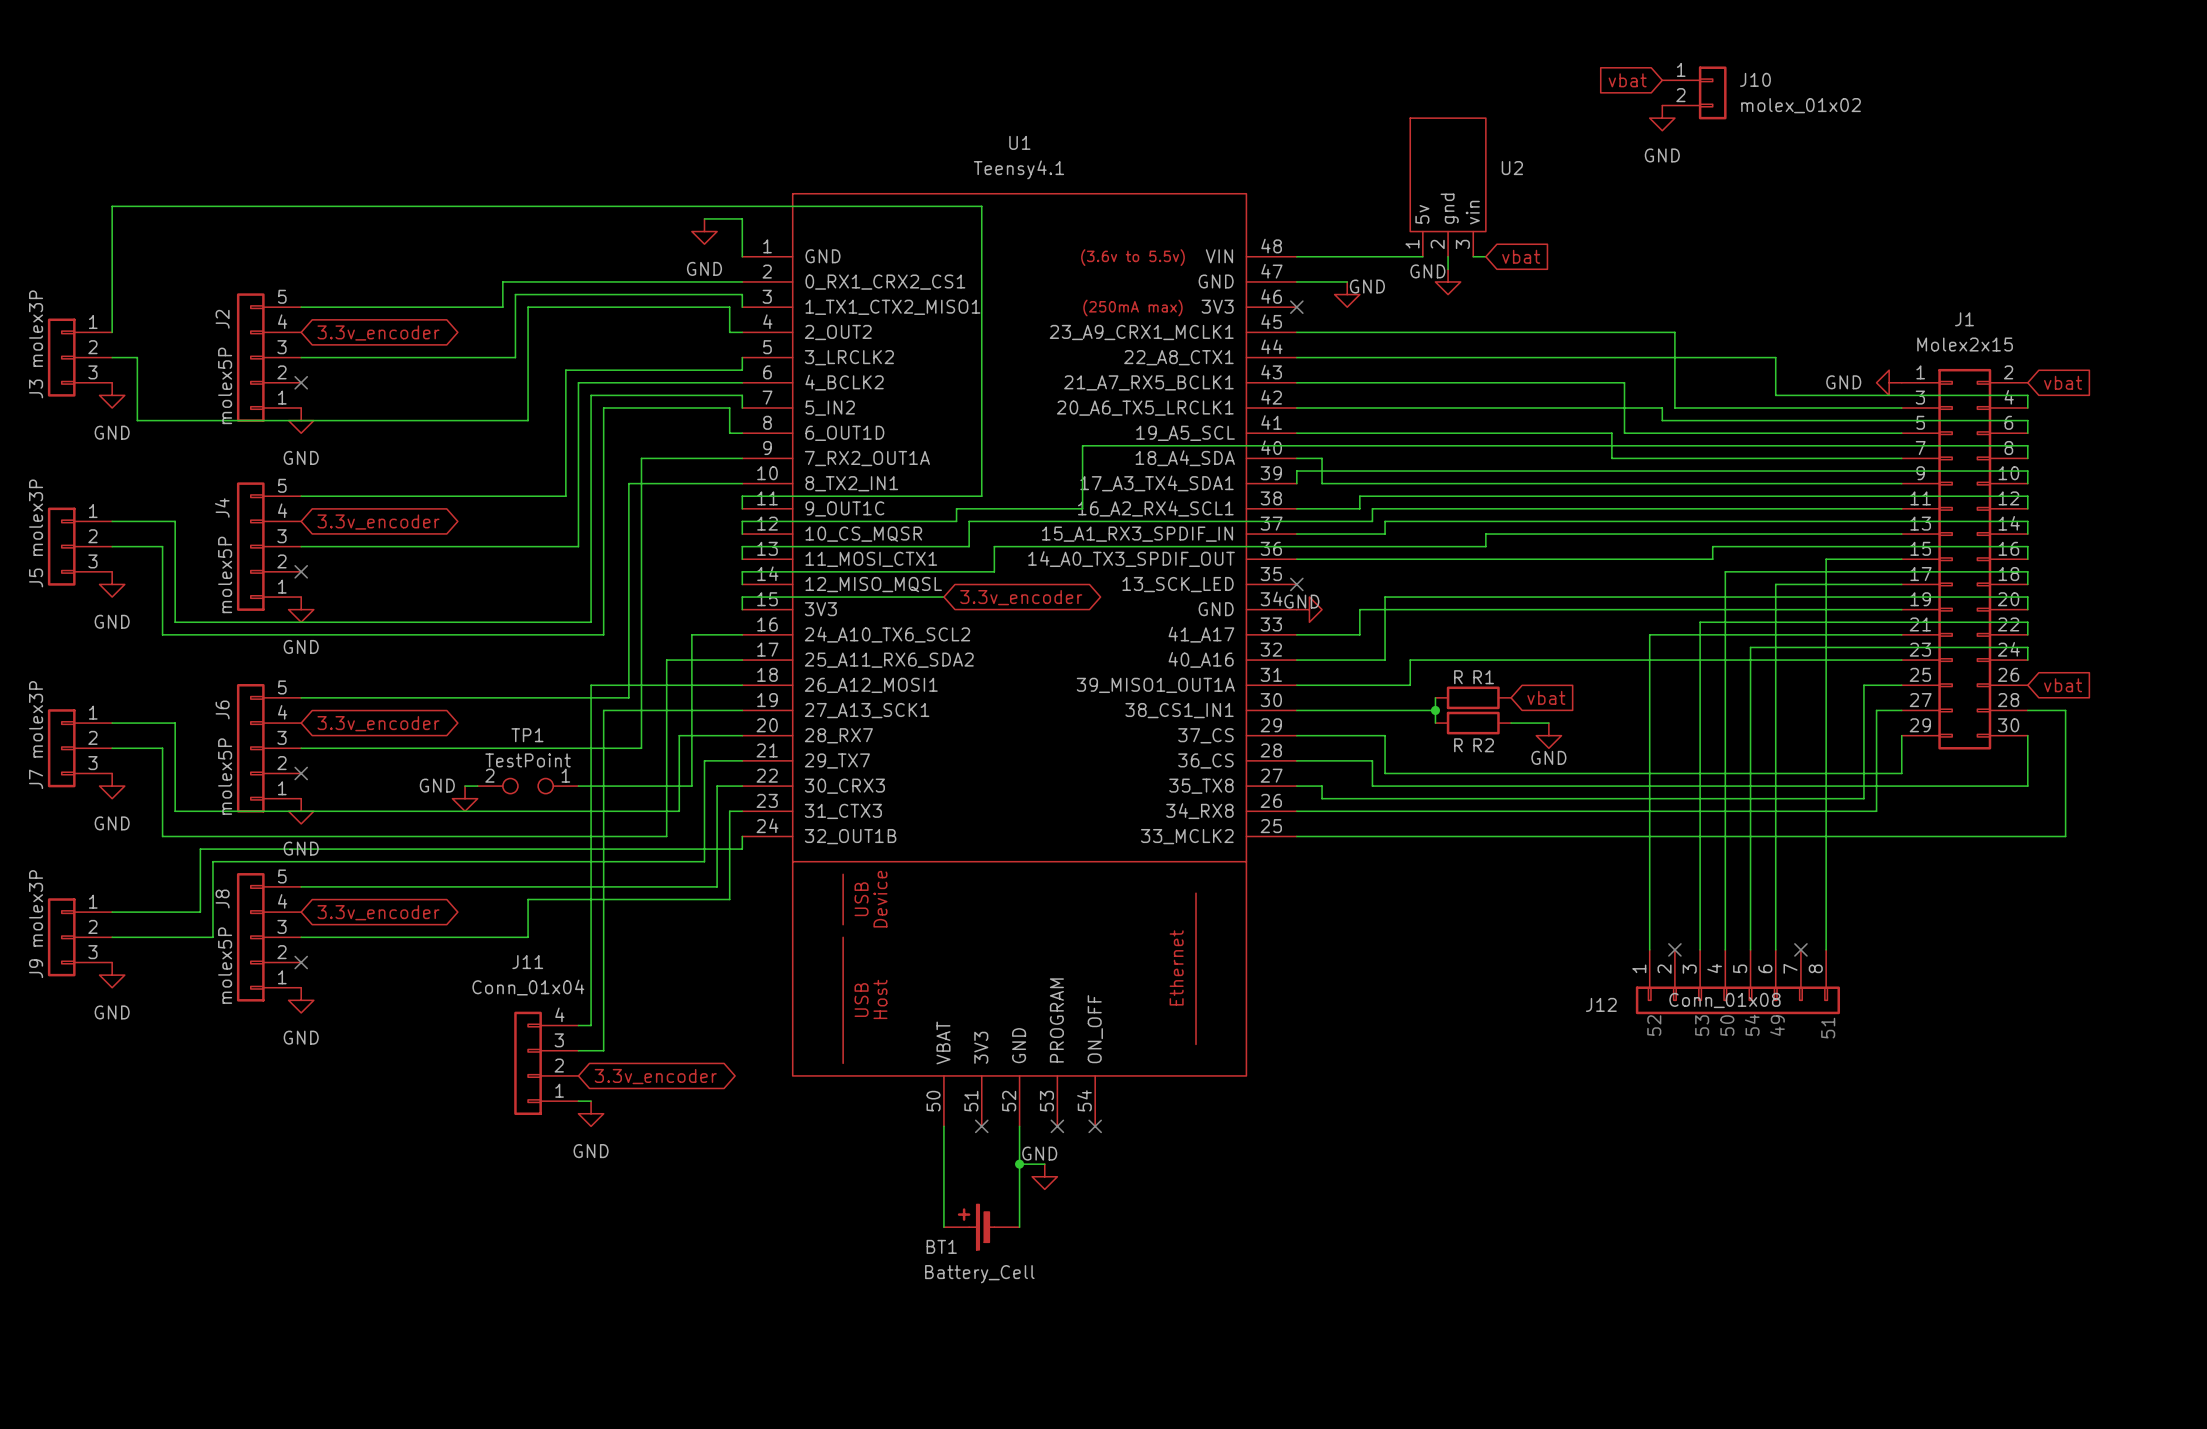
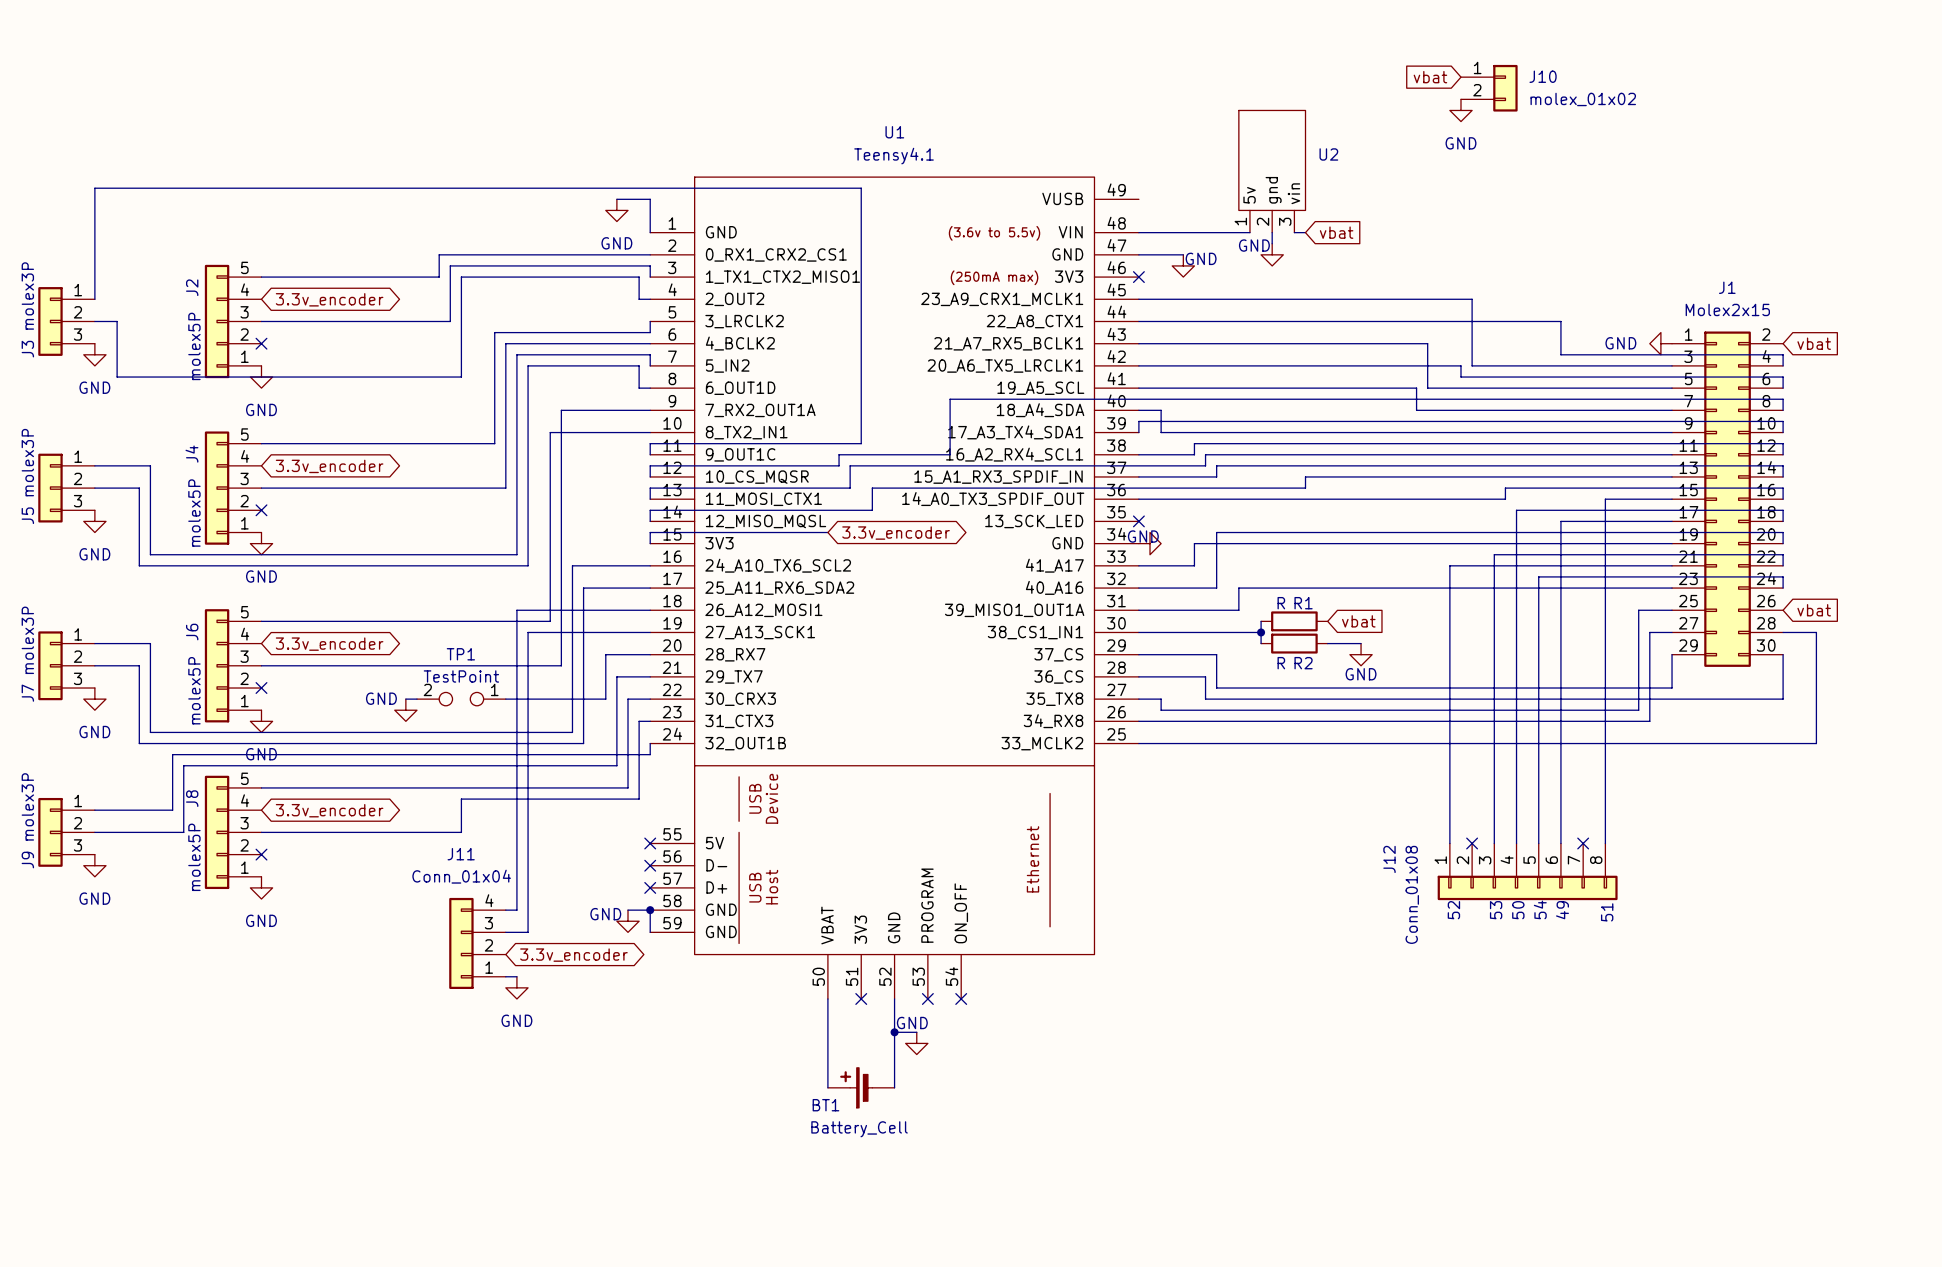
U1 symbol: [742, 193, 1297, 1127] -> [650, 177, 1139, 999]
wire: (691, 634) (691, 735) (679, 735) (679, 811) (175, 811) -> (605, 565) (572, 565) (572, 732) (150, 732) (150, 721)
no-connect mark: none -> (650, 843)
no-connect mark: none -> (650, 865)
no-connect mark: none -> (650, 887)
J12 value rotation: 0° (1724, 1000) -> 90° counterclockwise (1412, 894)
J12 name rotation: 0° (1601, 1004) -> 90° counterclockwise (1389, 859)
wire: none -> (628, 910) (650, 910) (650, 932)
junction: none -> (650, 910)
power symbol: none -> GND (628, 921)

